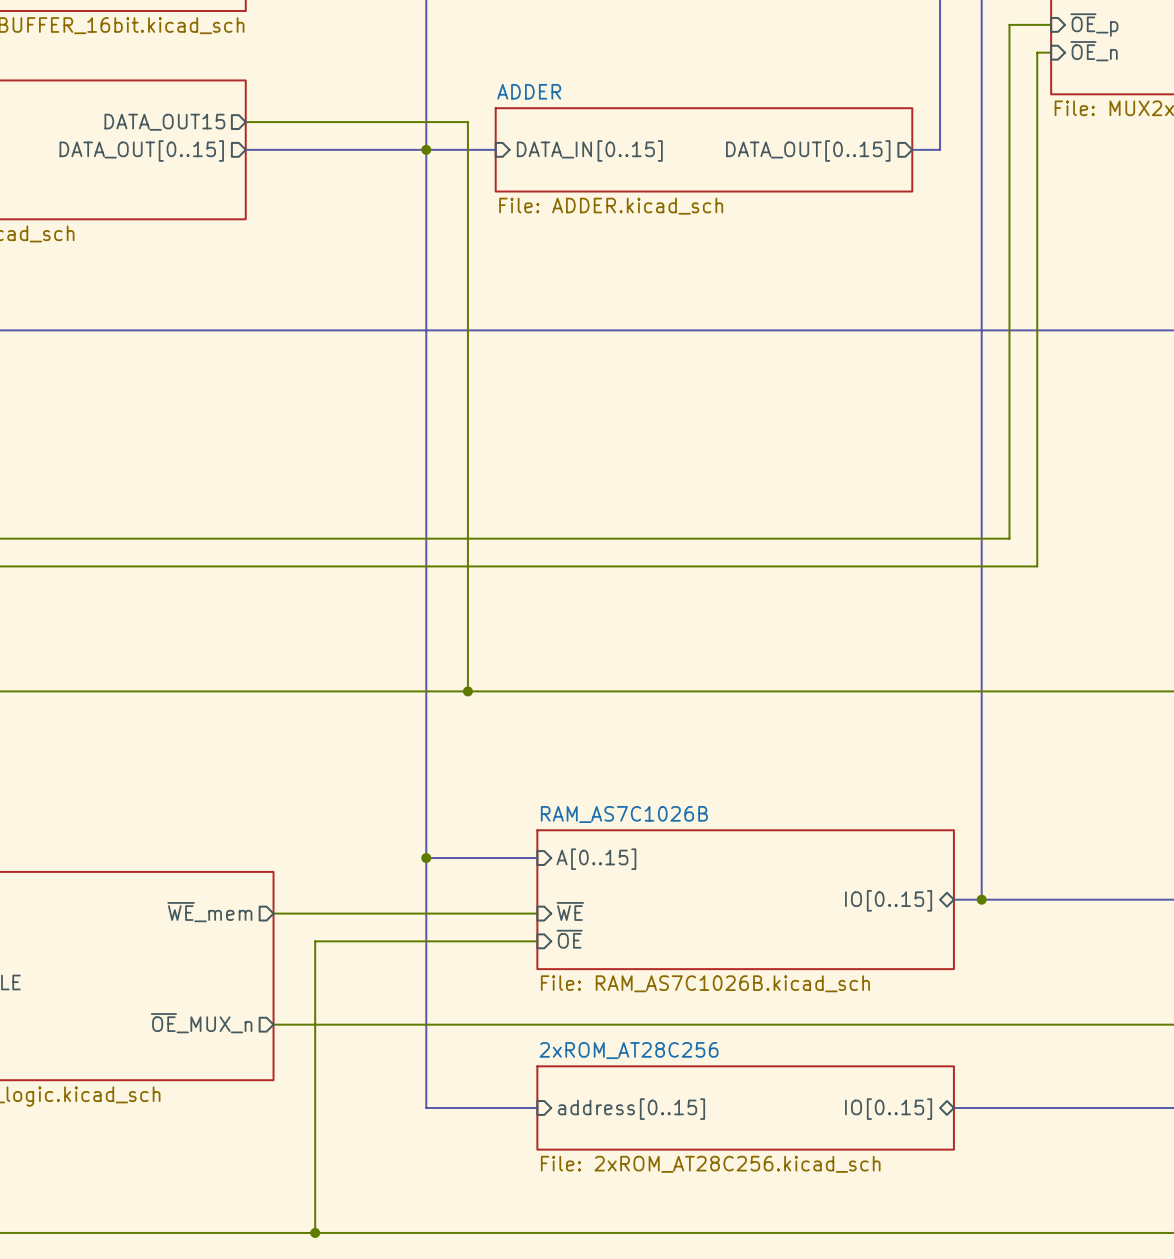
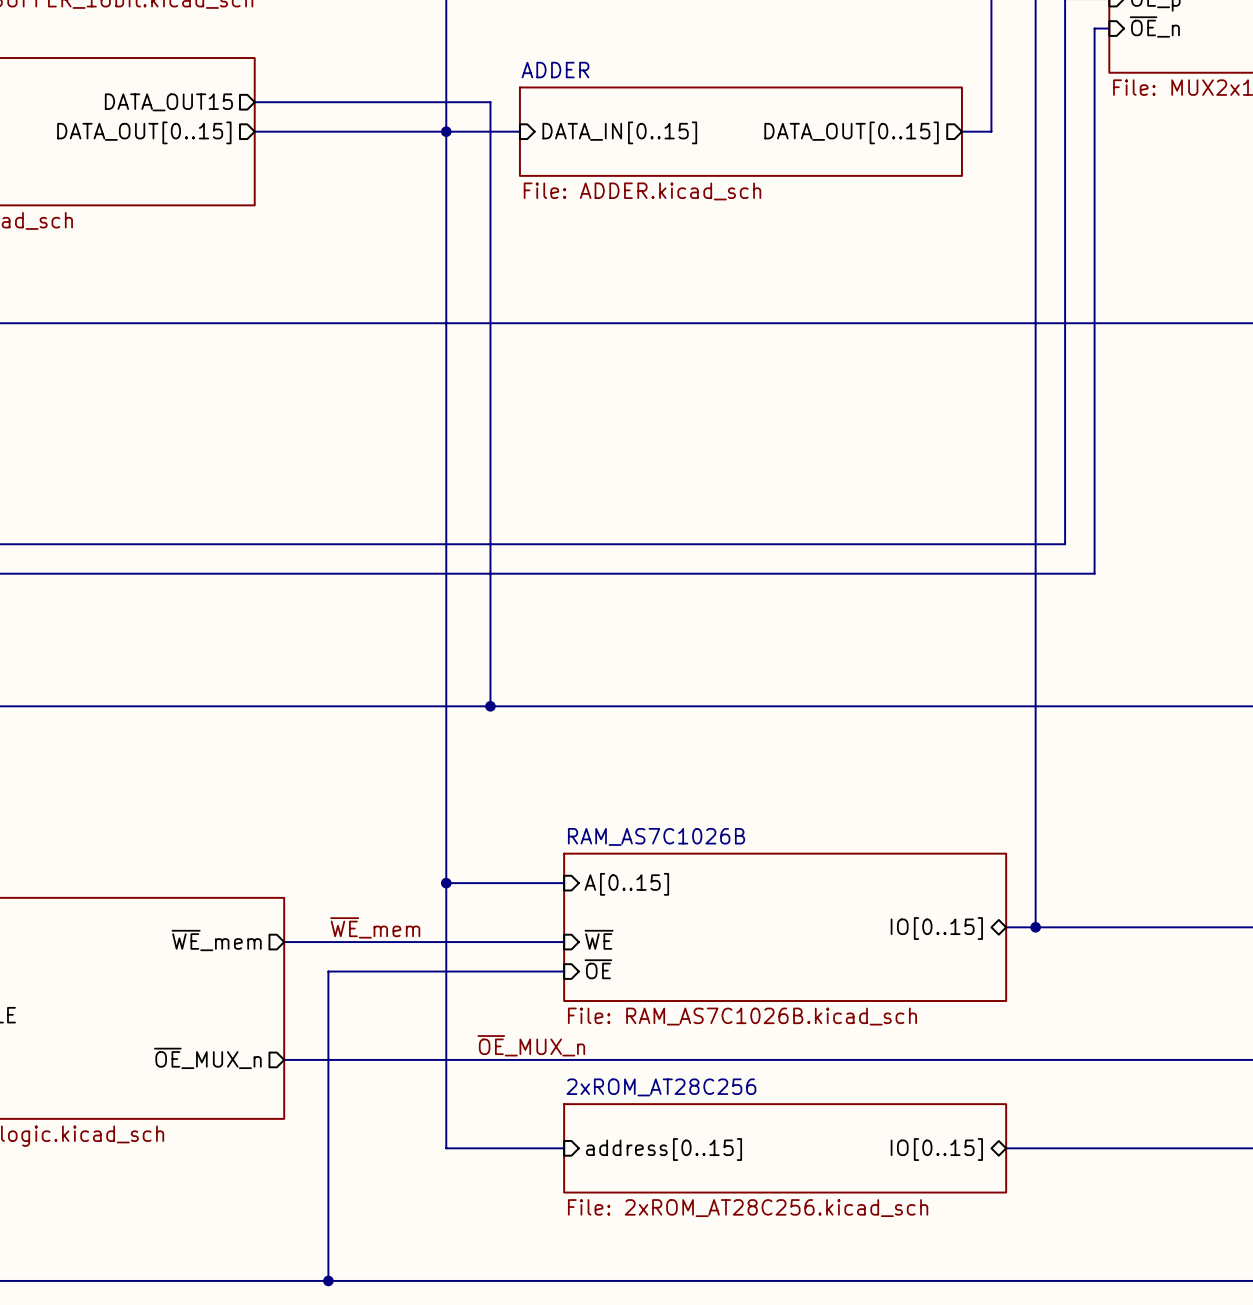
label: none -> ~{WE}_mem (375, 927)
label: none -> ~{OE}_MUX_n (531, 1045)

